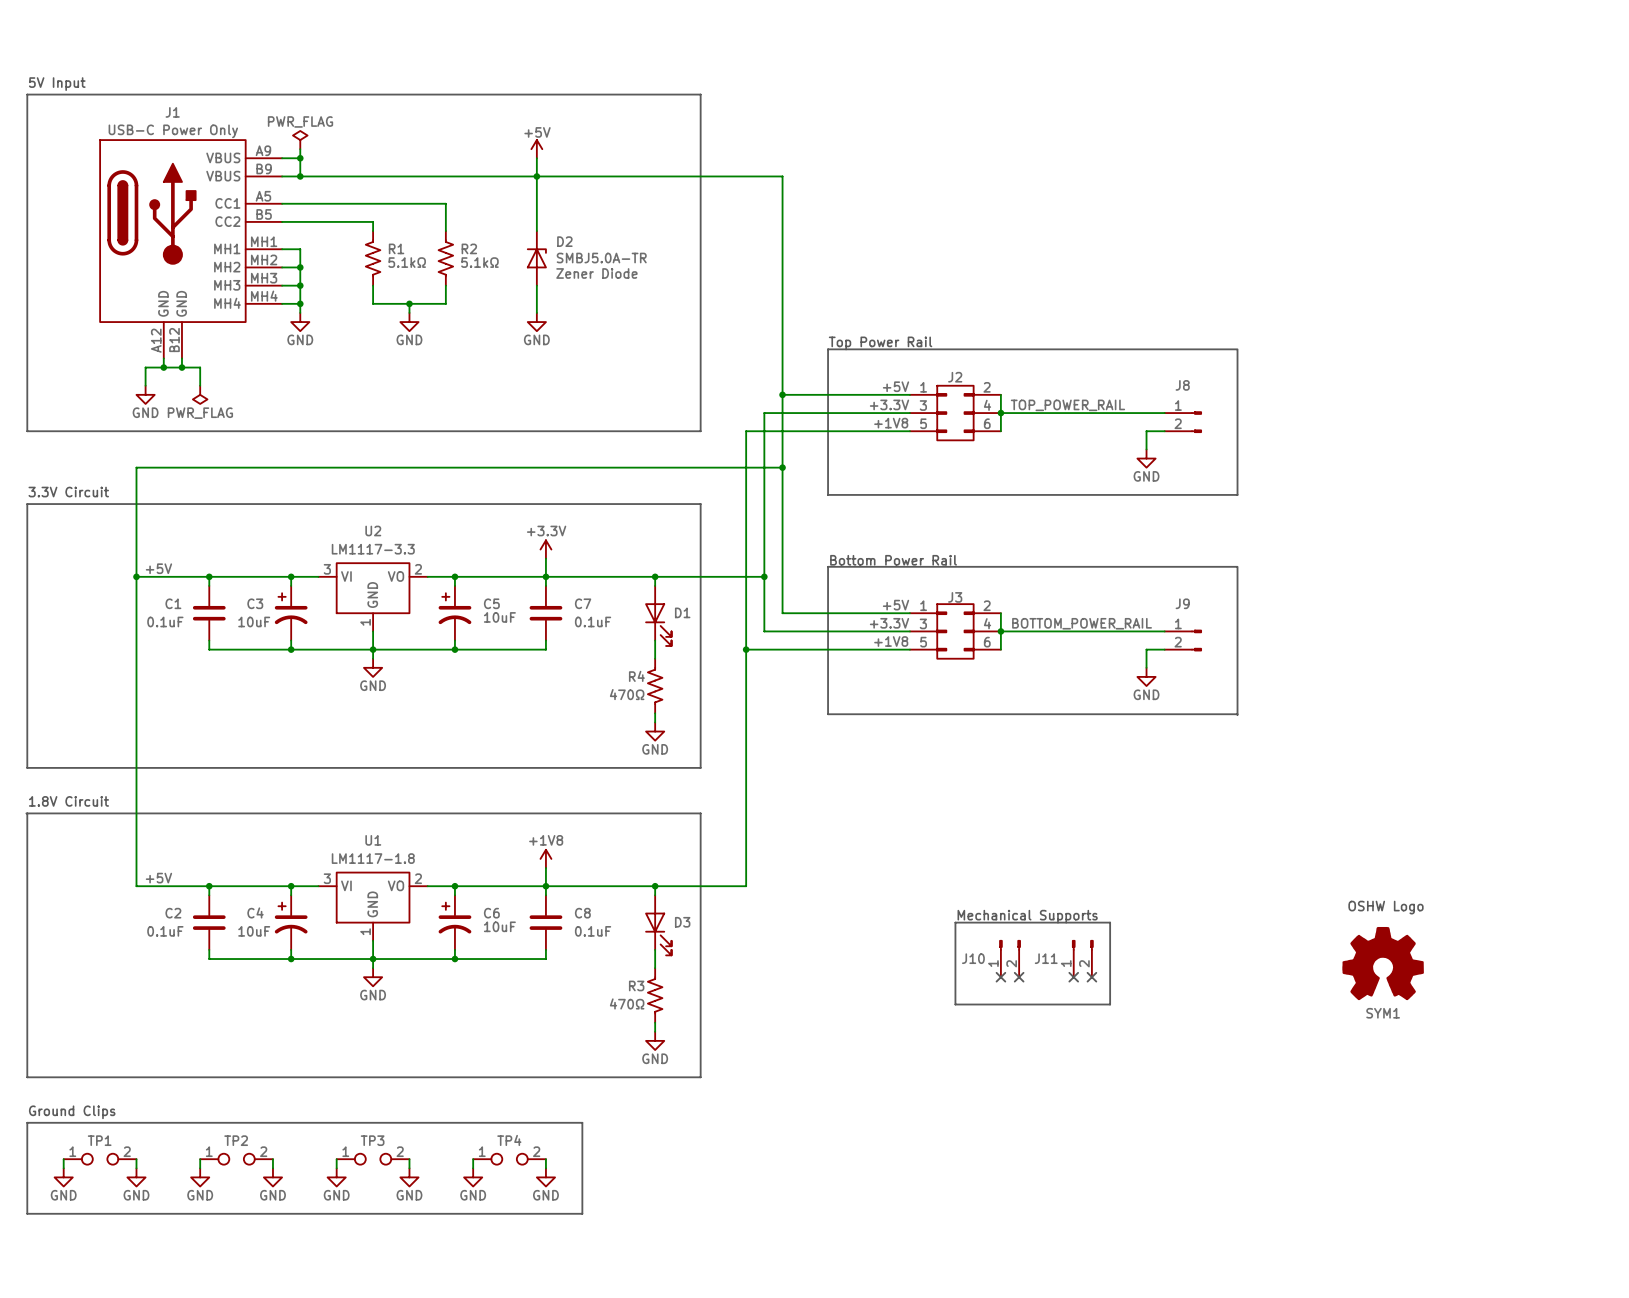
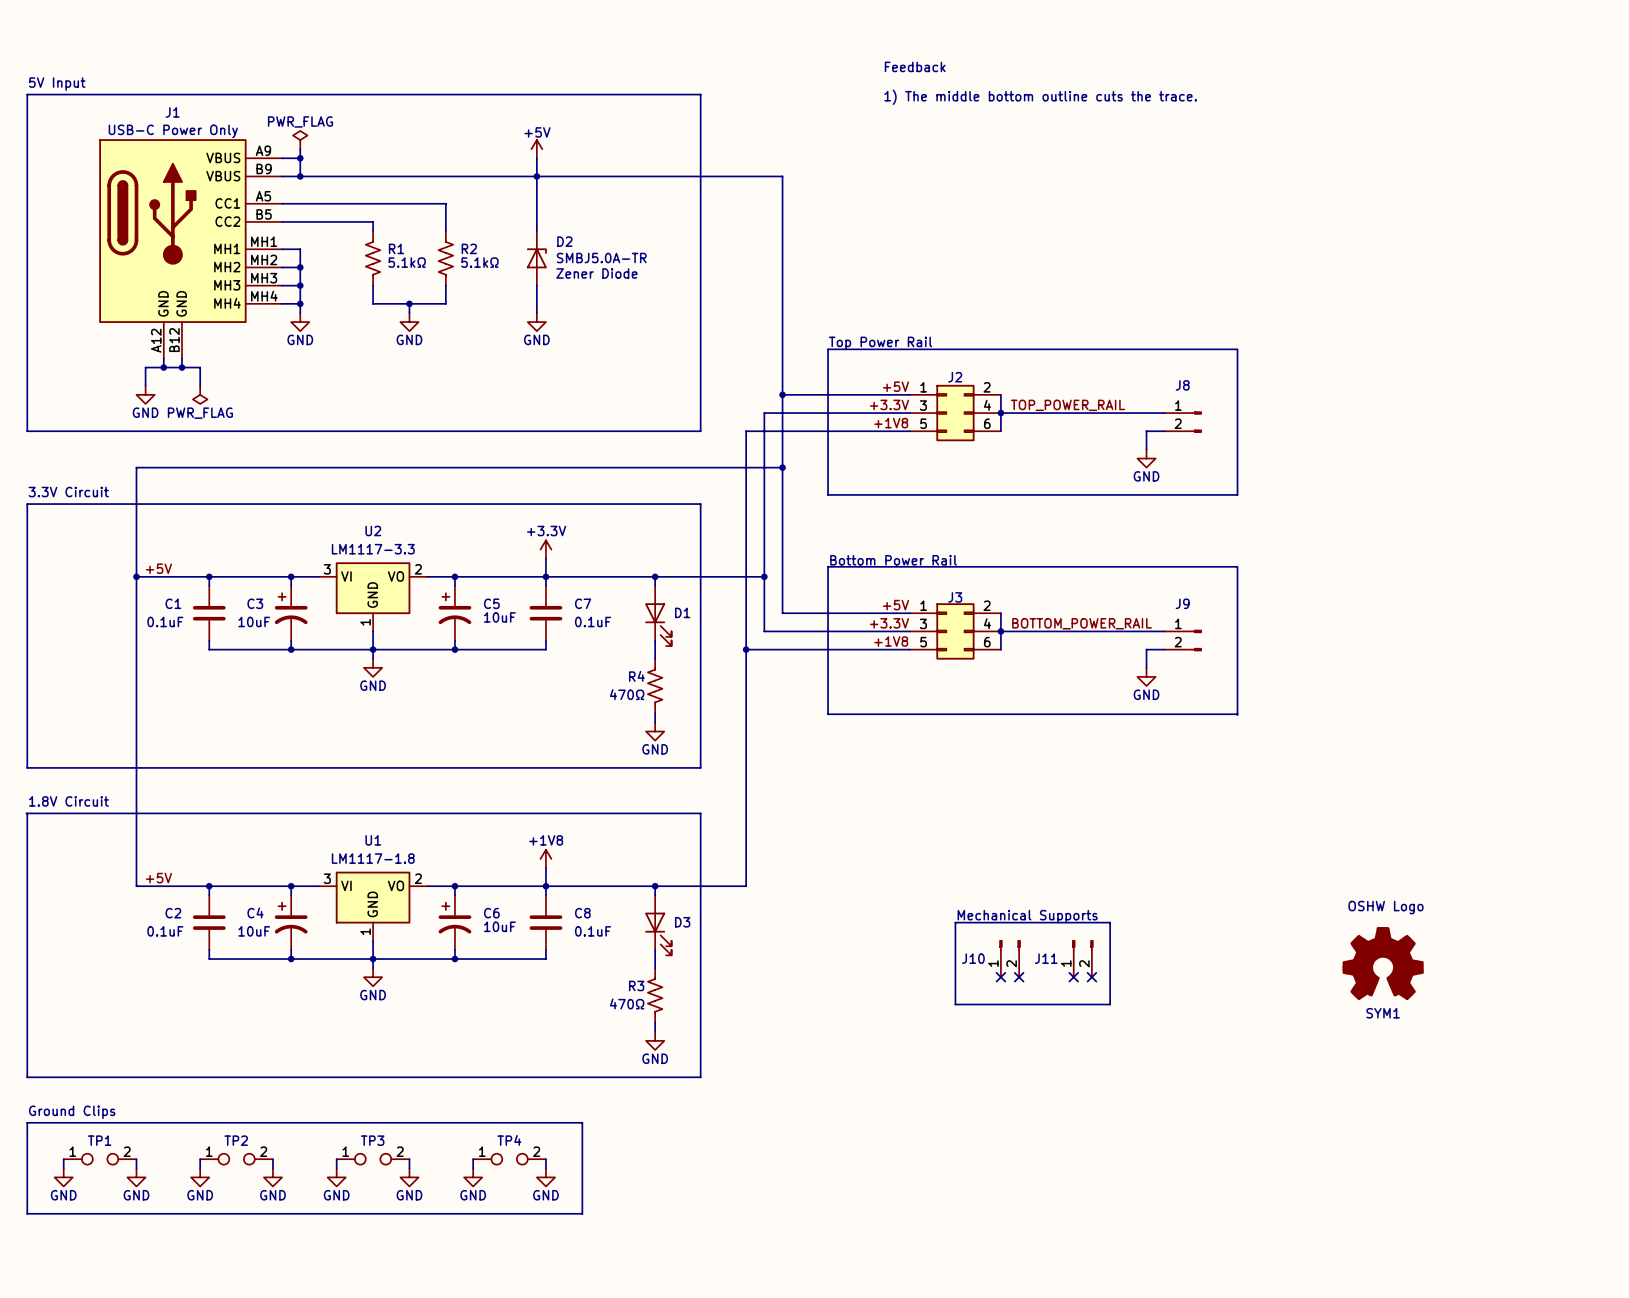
text: none -> Feedback (915, 66)
text: none -> 1) The middle bottom outline cuts the trace. (1040, 97)

